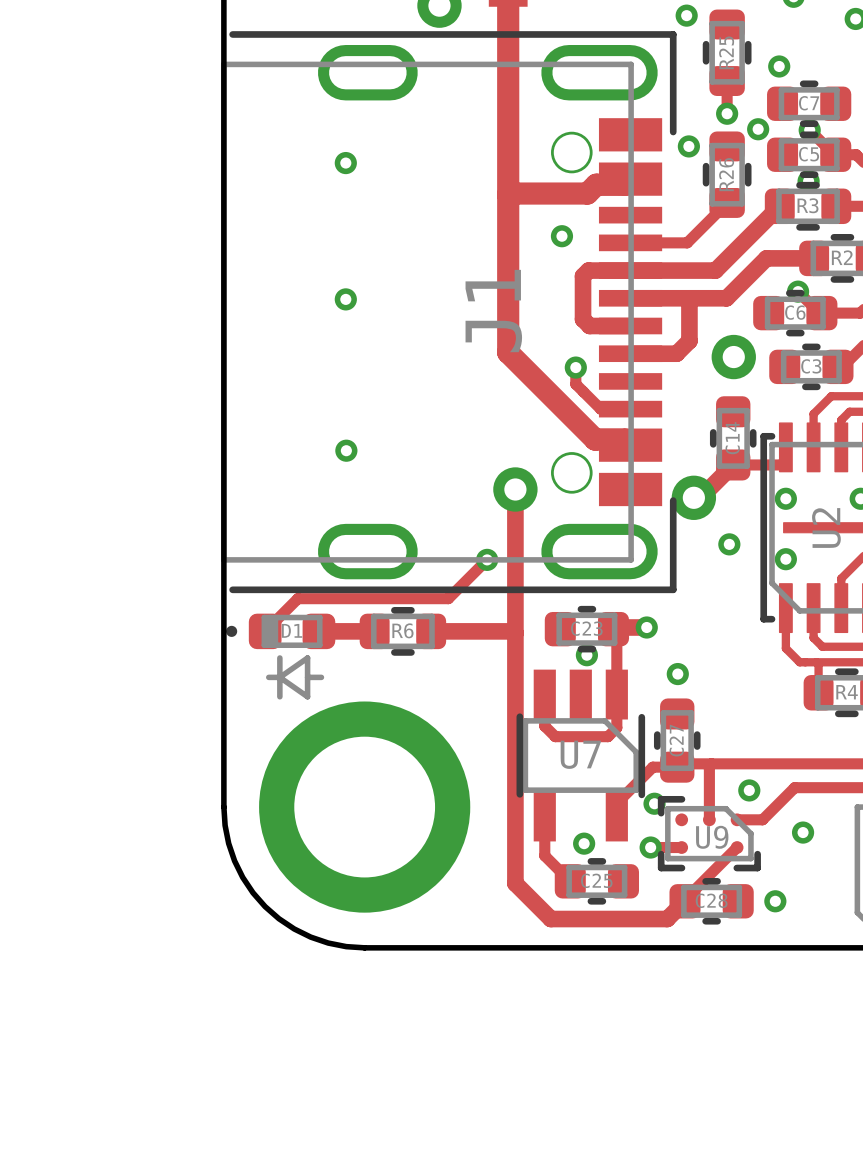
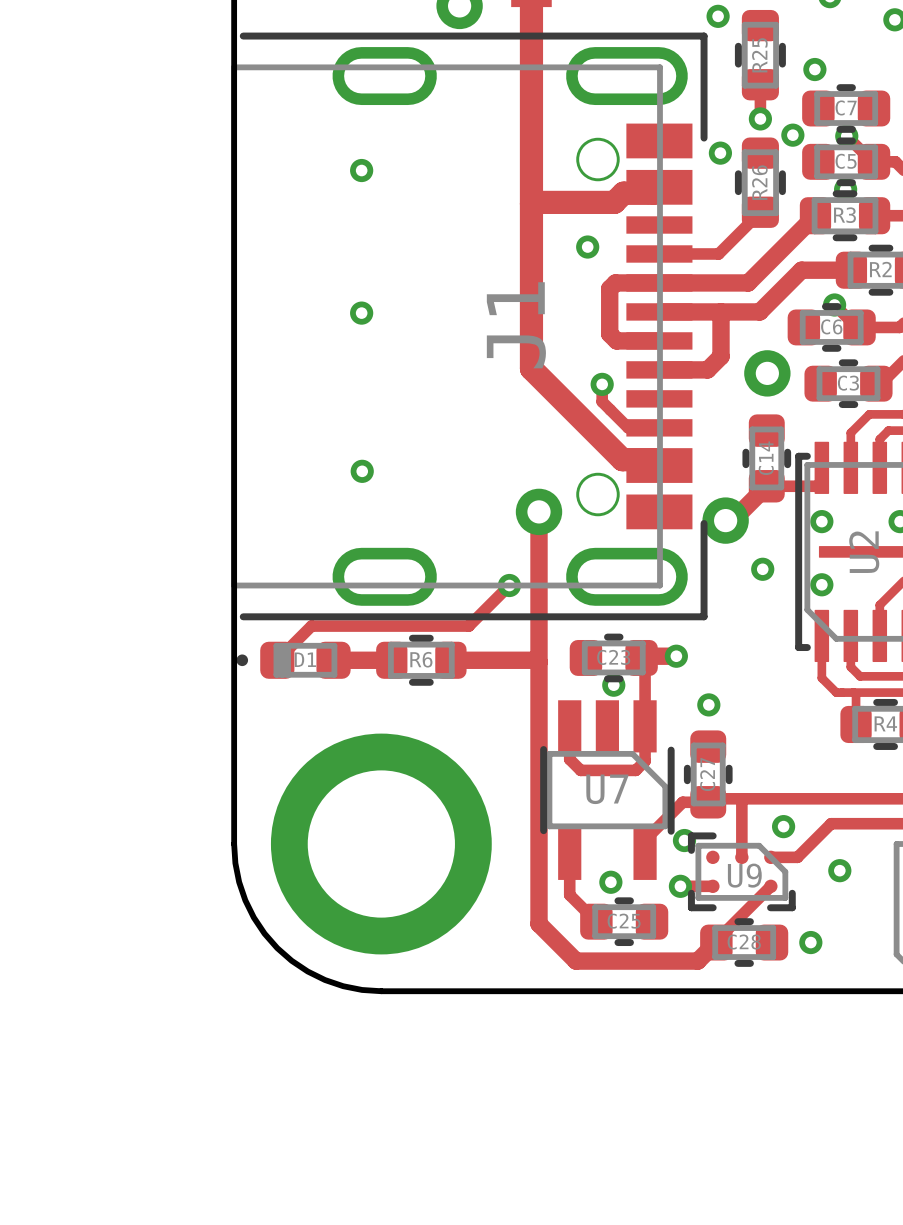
line: (279, 657) (279, 696) -> none
line: (268, 677) (279, 677) -> none
line: (279, 677) (307, 696) (307, 657) (279, 677) -> none
line: (307, 677) (321, 677) -> none

